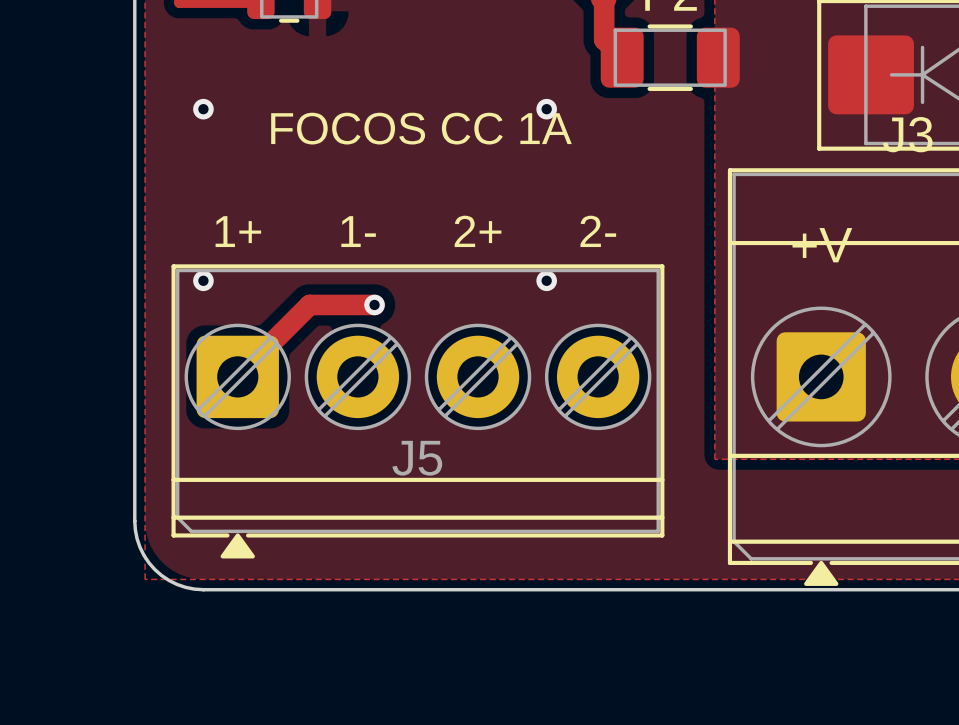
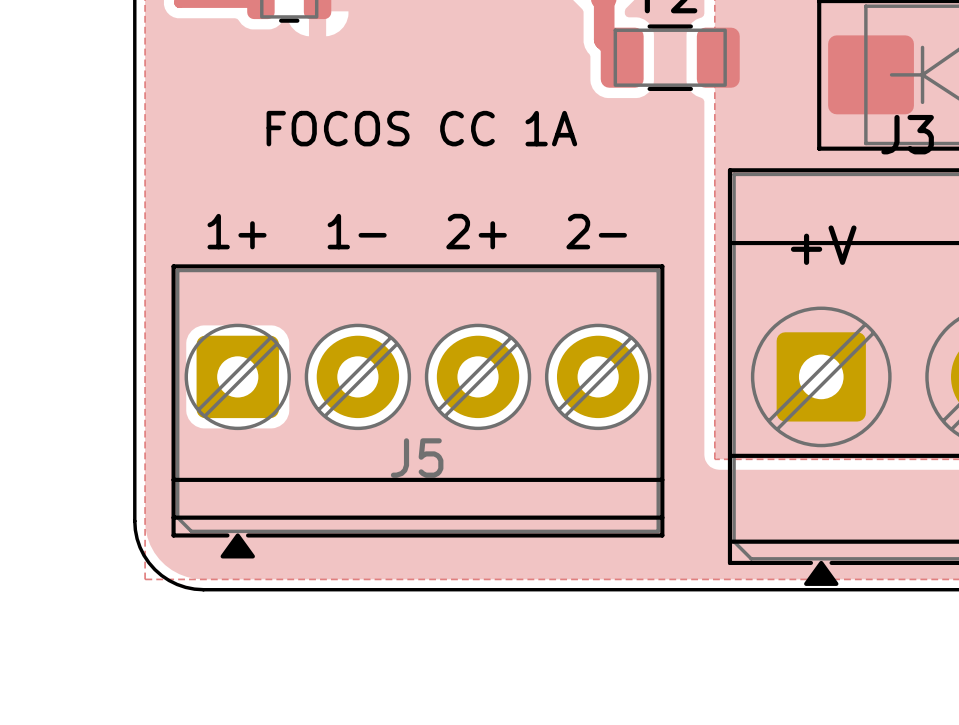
via: (203, 109) -> none
via: (546, 109) -> none
via: (203, 280) -> none
via: (546, 280) -> none
track: (374, 304) (309, 304) (237, 376) -> none
via: (374, 304) -> none

